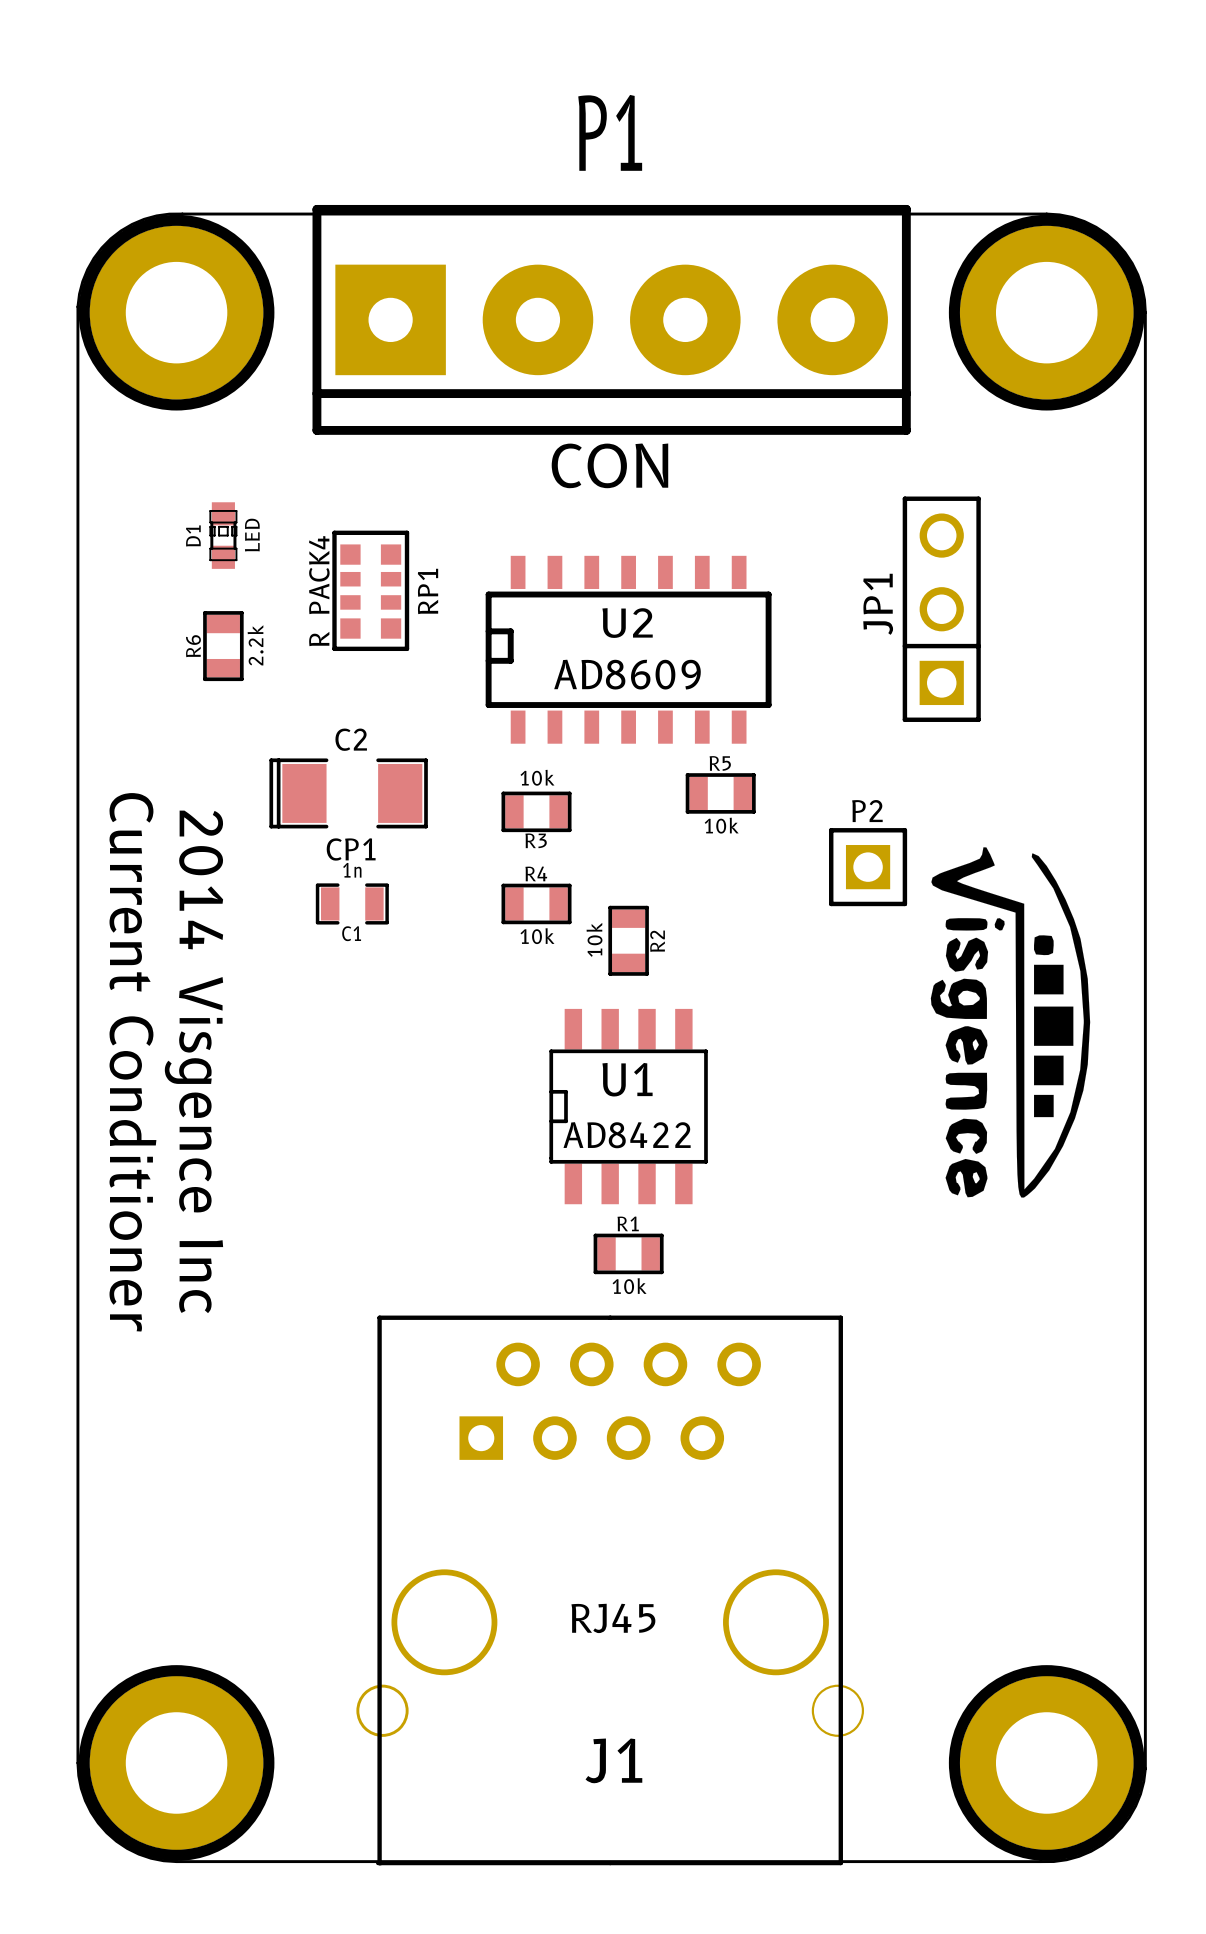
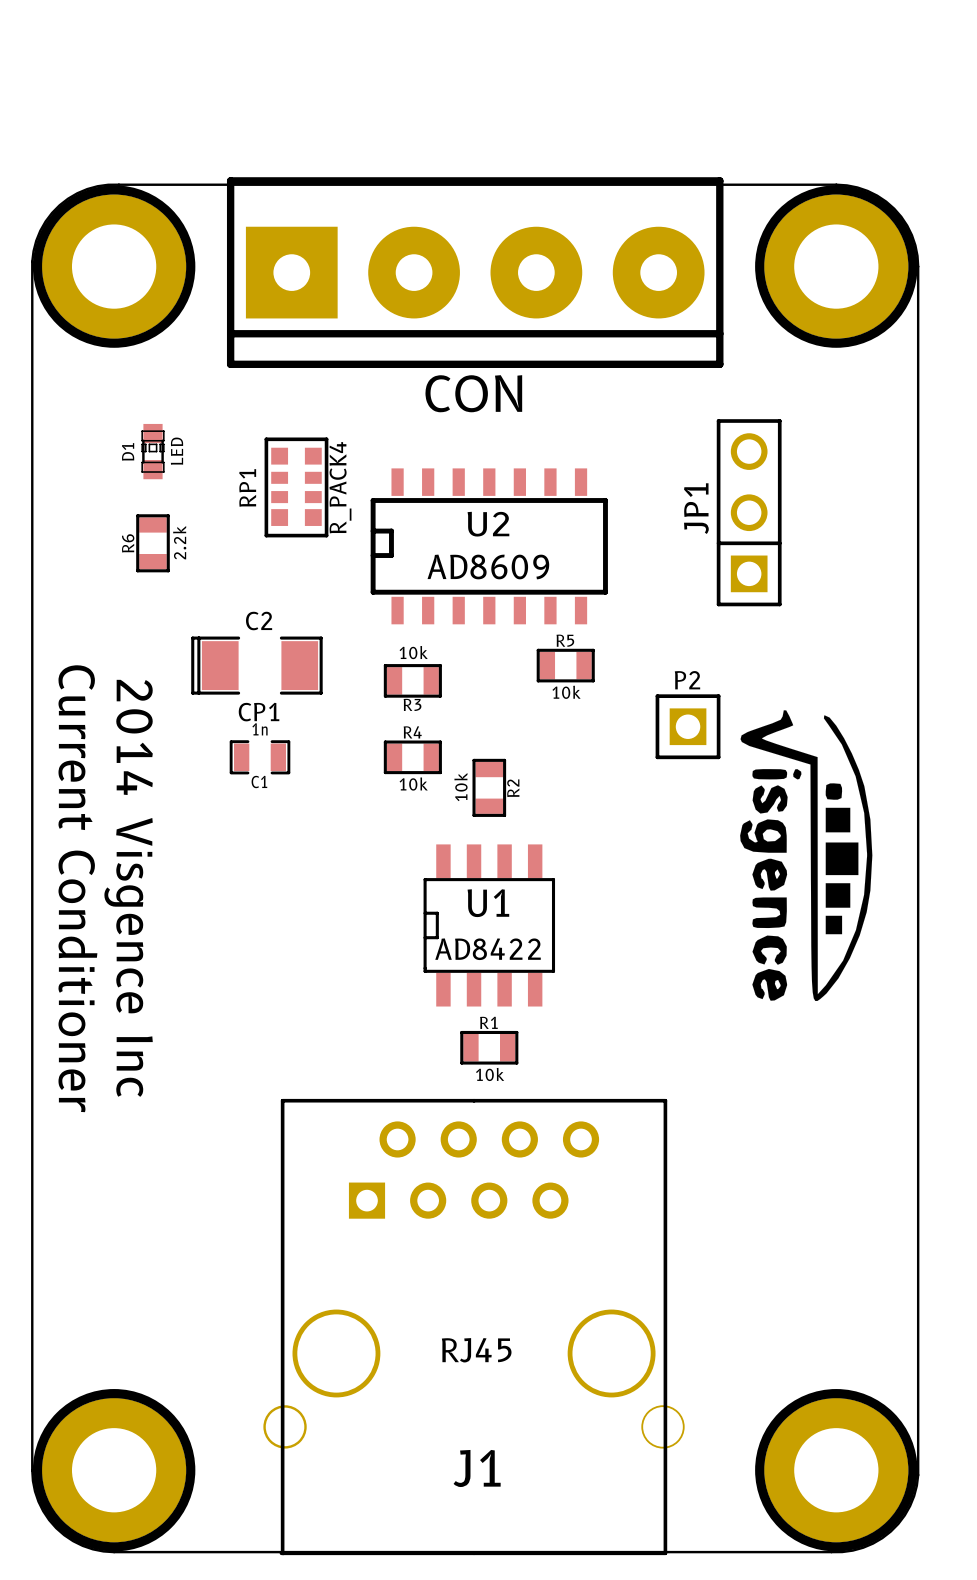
P1 name: P1 (610, 132) -> none
RP1 rotation: 0° (370, 590) -> 180° (296, 487)

